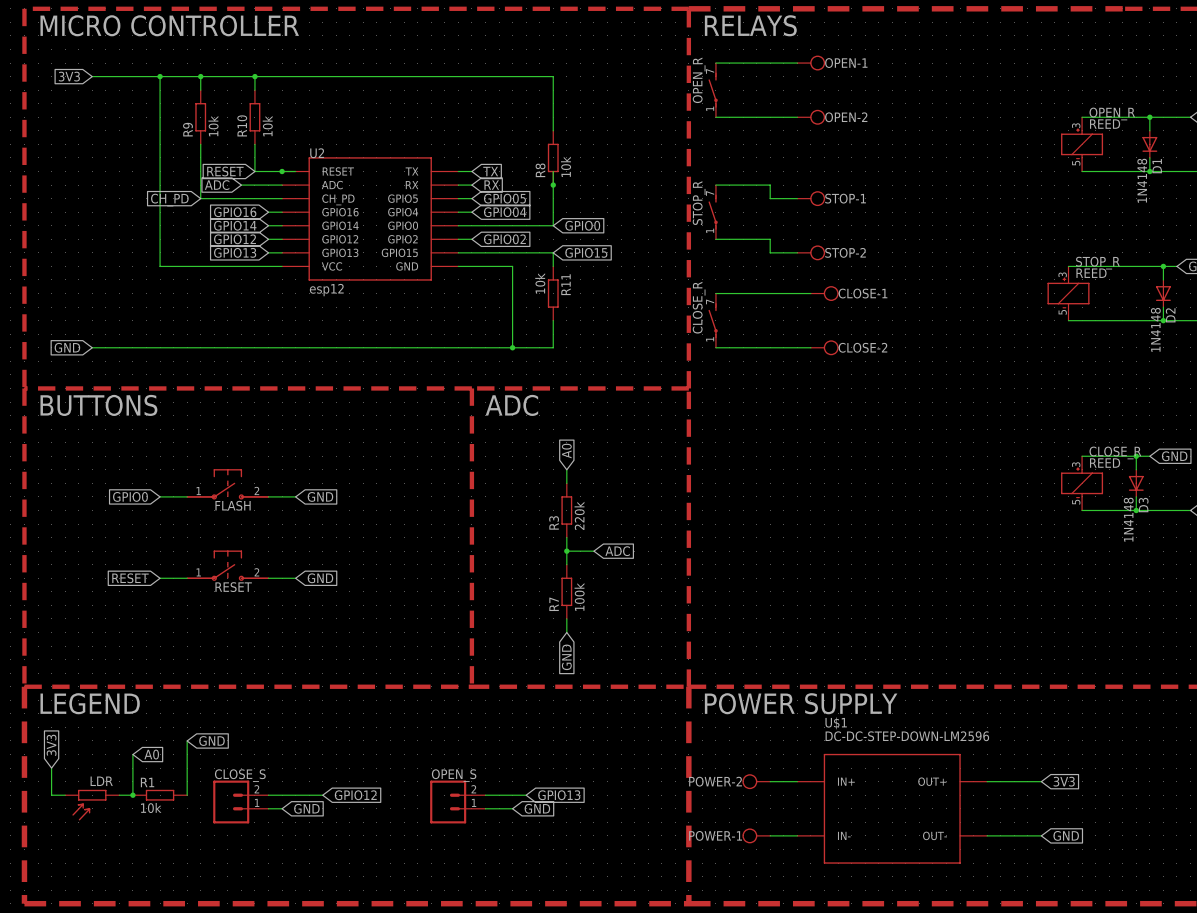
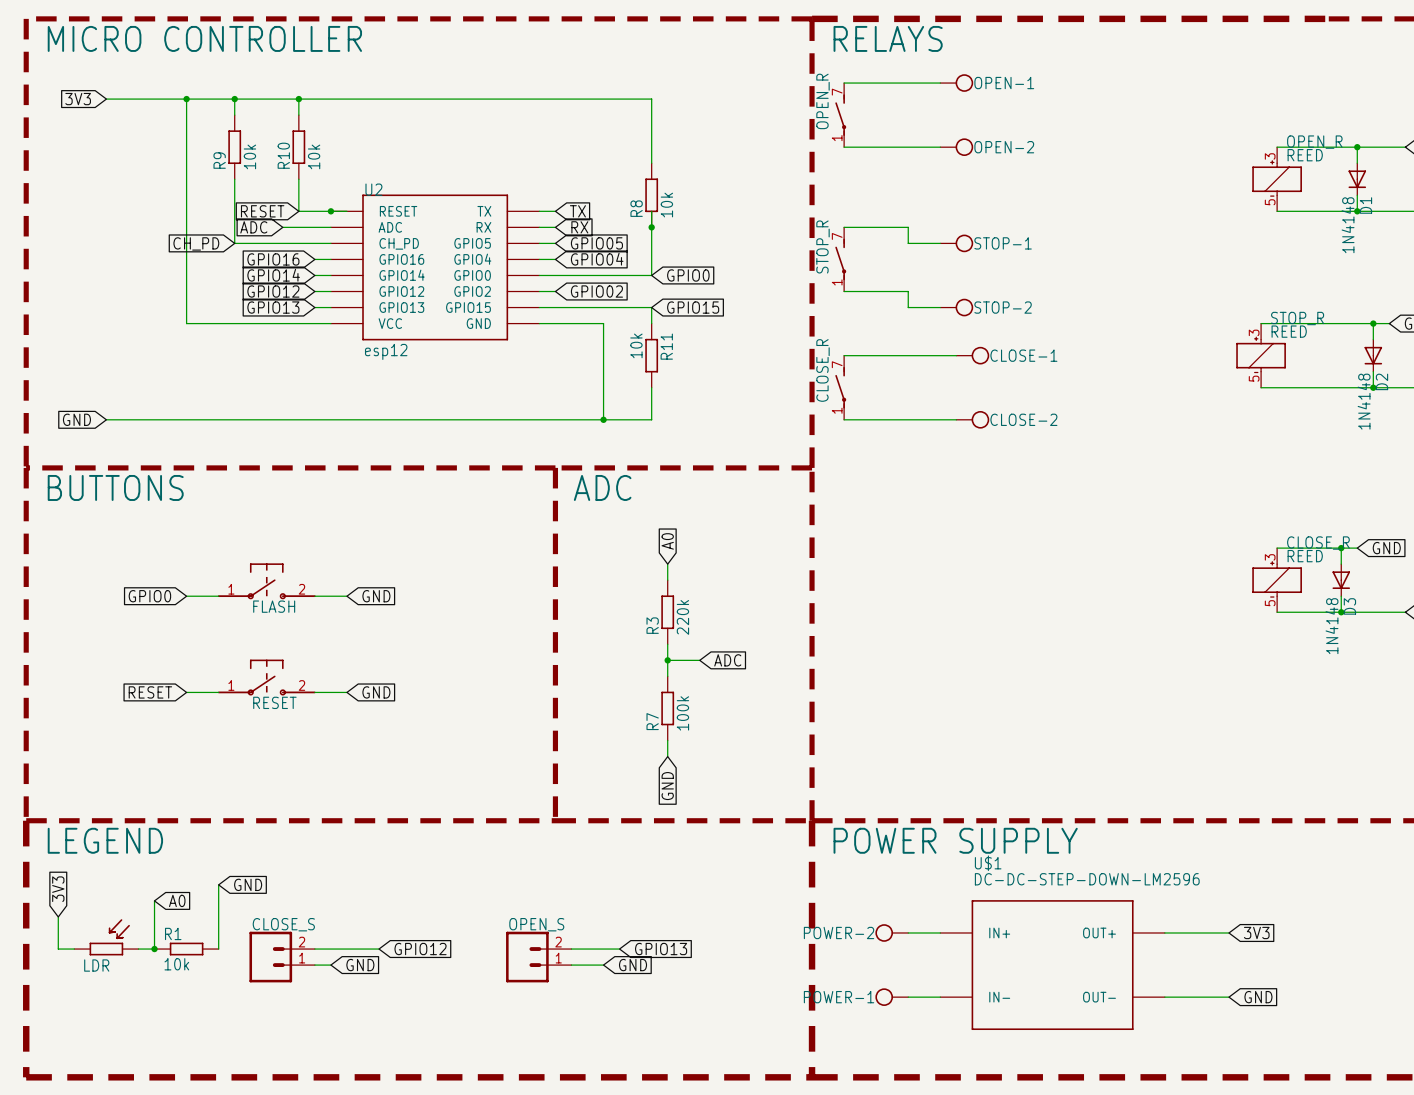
LDR rotation: 0° (89, 805) -> 180° (109, 937)

